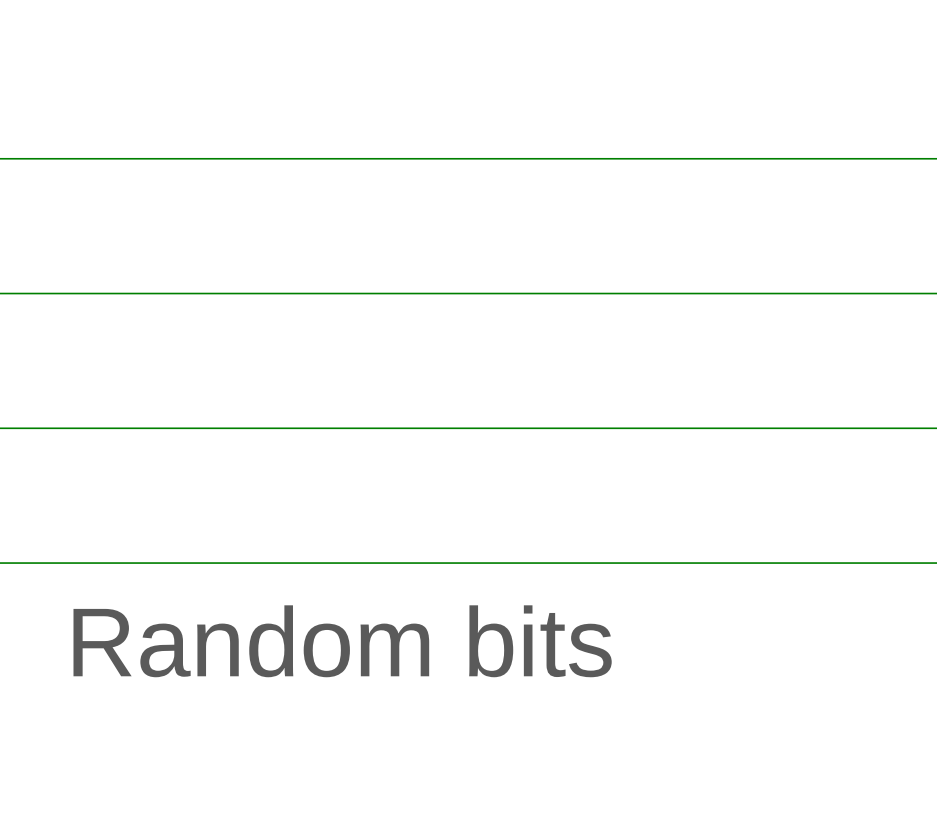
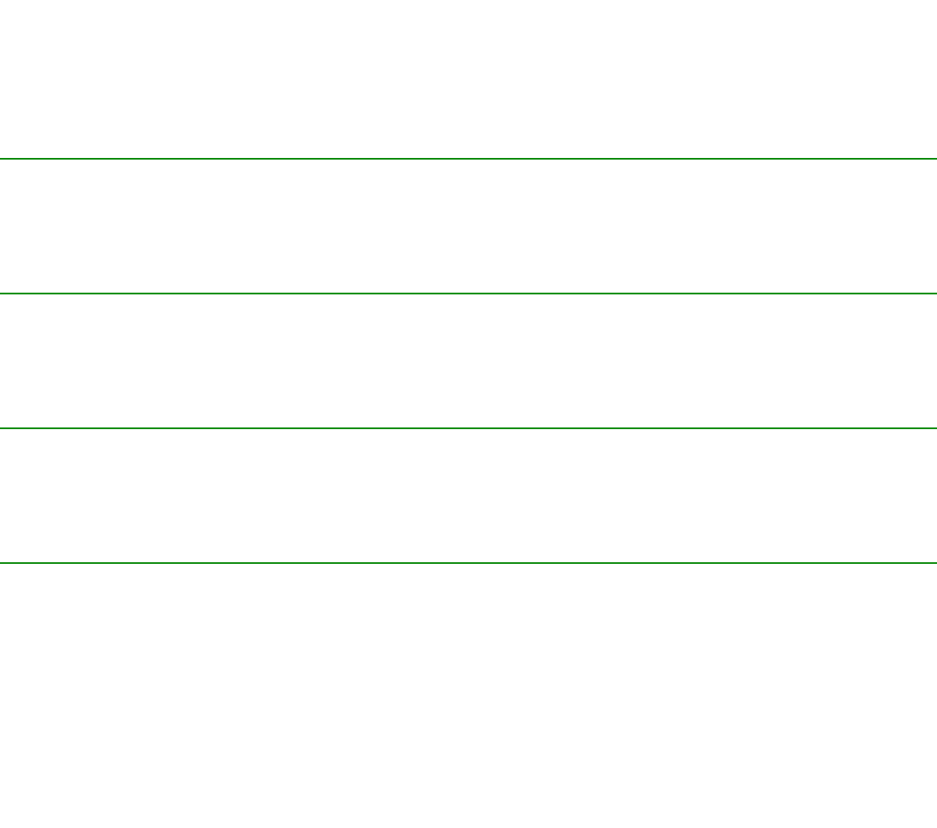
text: Random bits (342, 641) -> none

